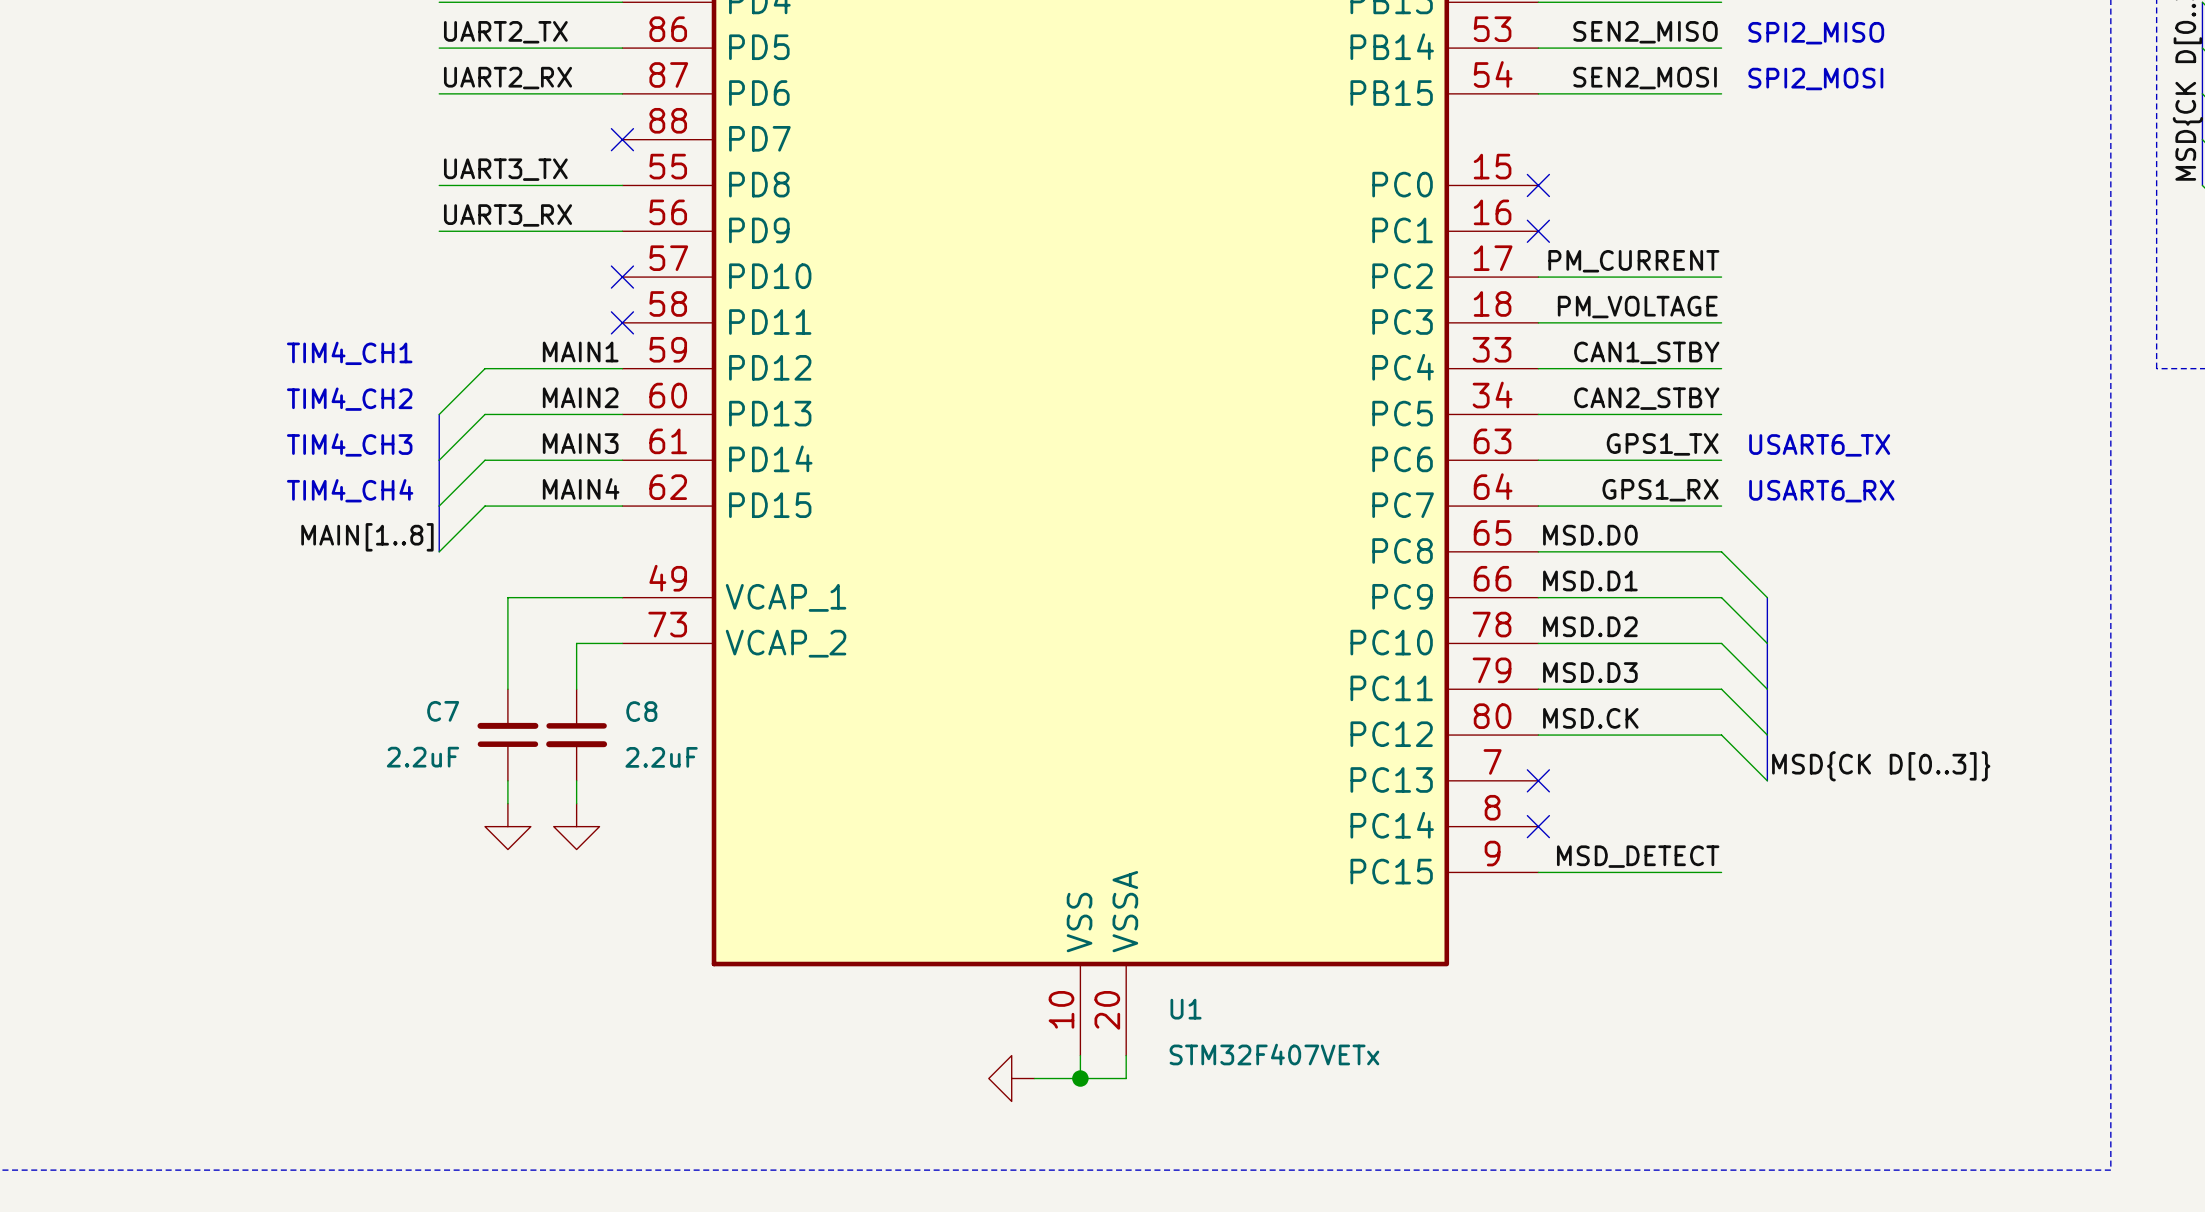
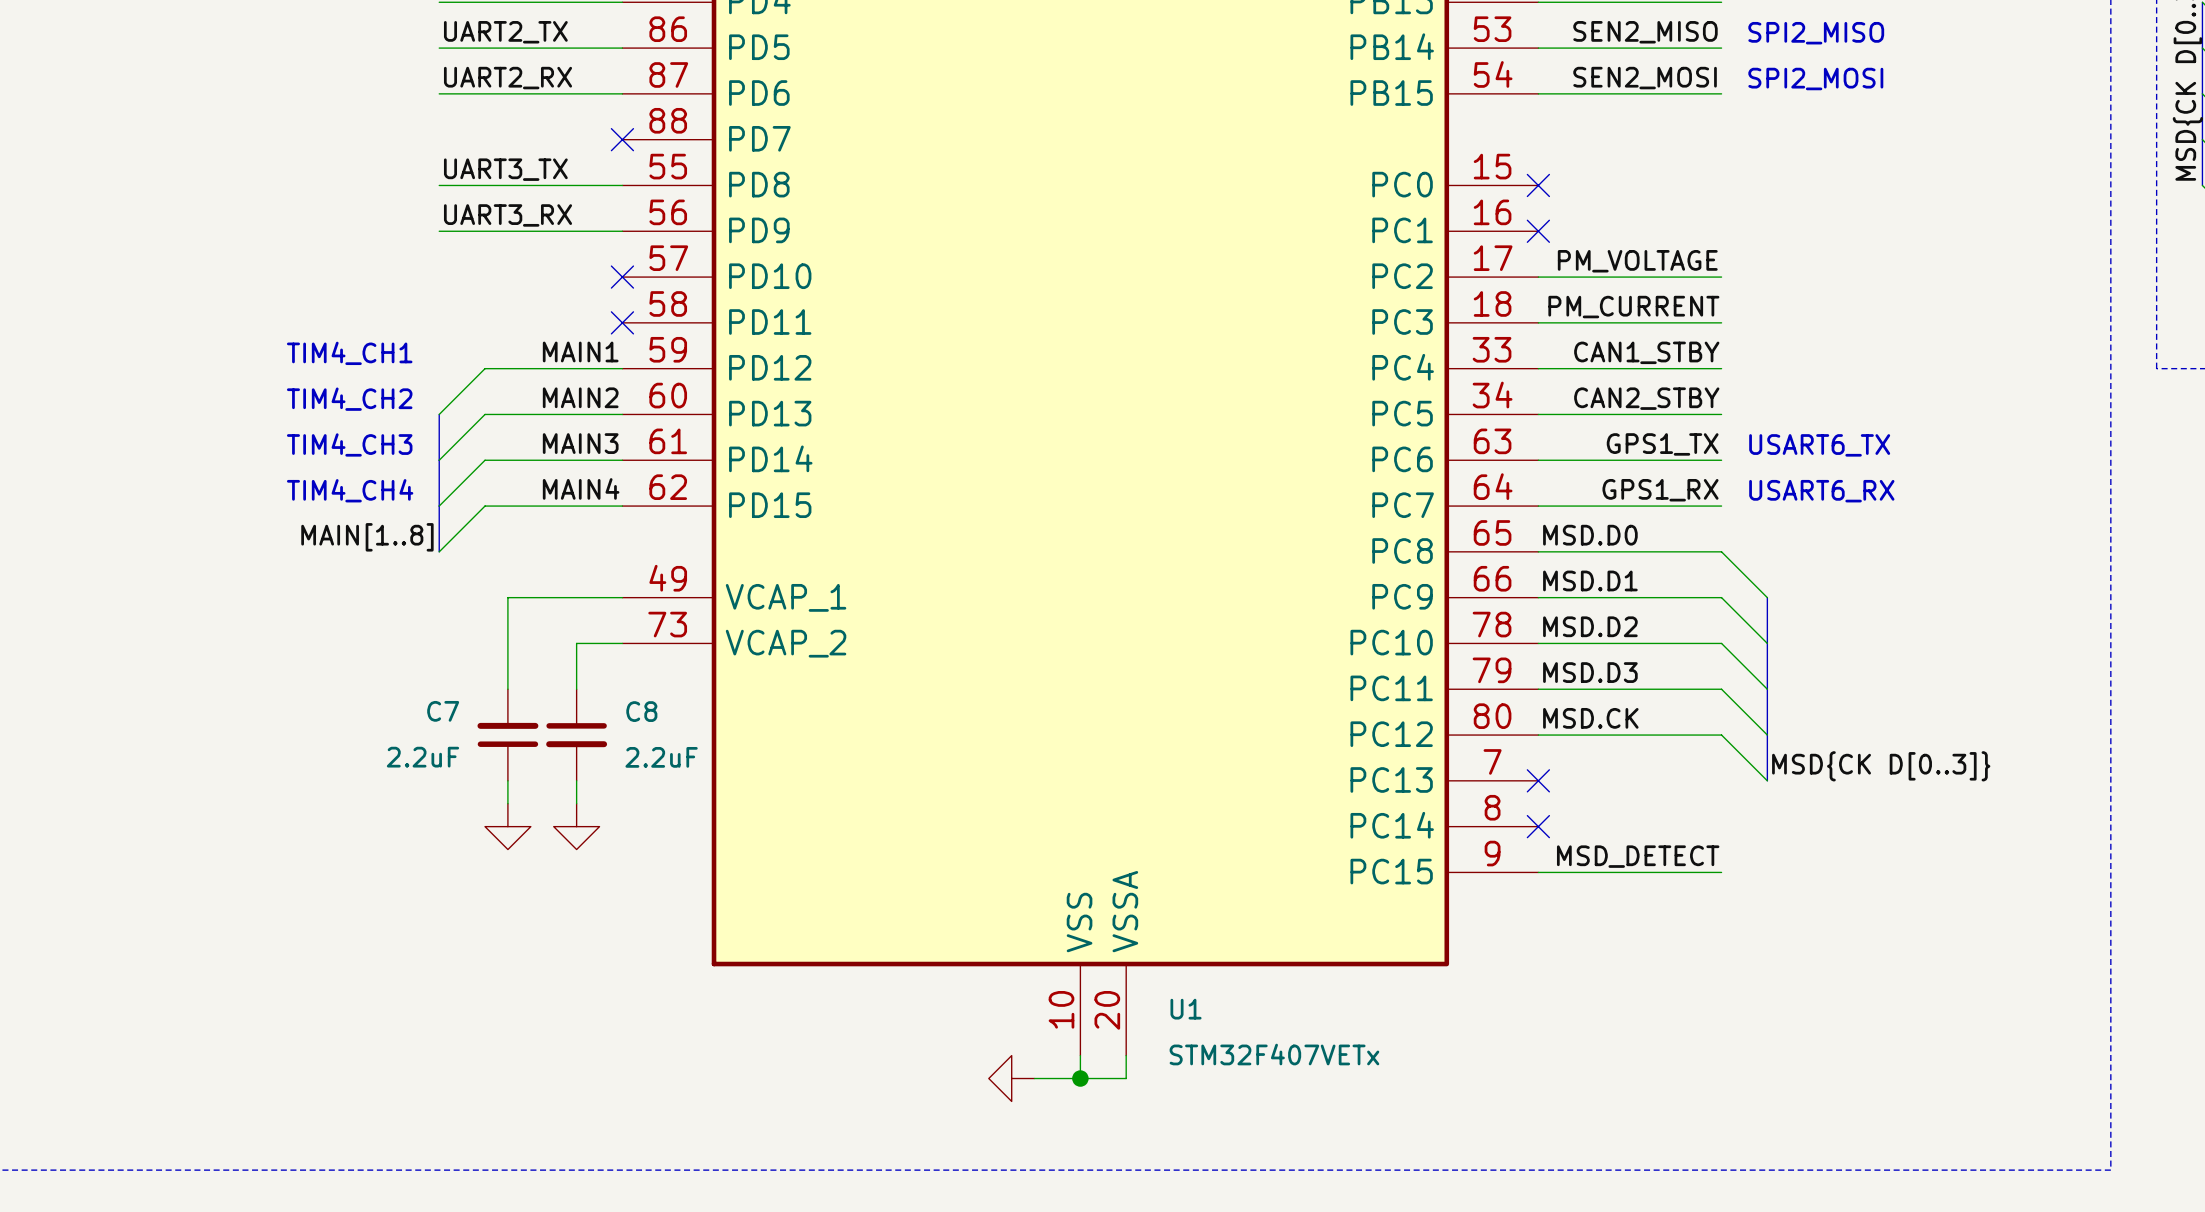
label: PM_CURRENT (1633, 261) -> PM_VOLTAGE (1637, 261)
label: PM_VOLTAGE (1637, 307) -> PM_CURRENT (1633, 307)

